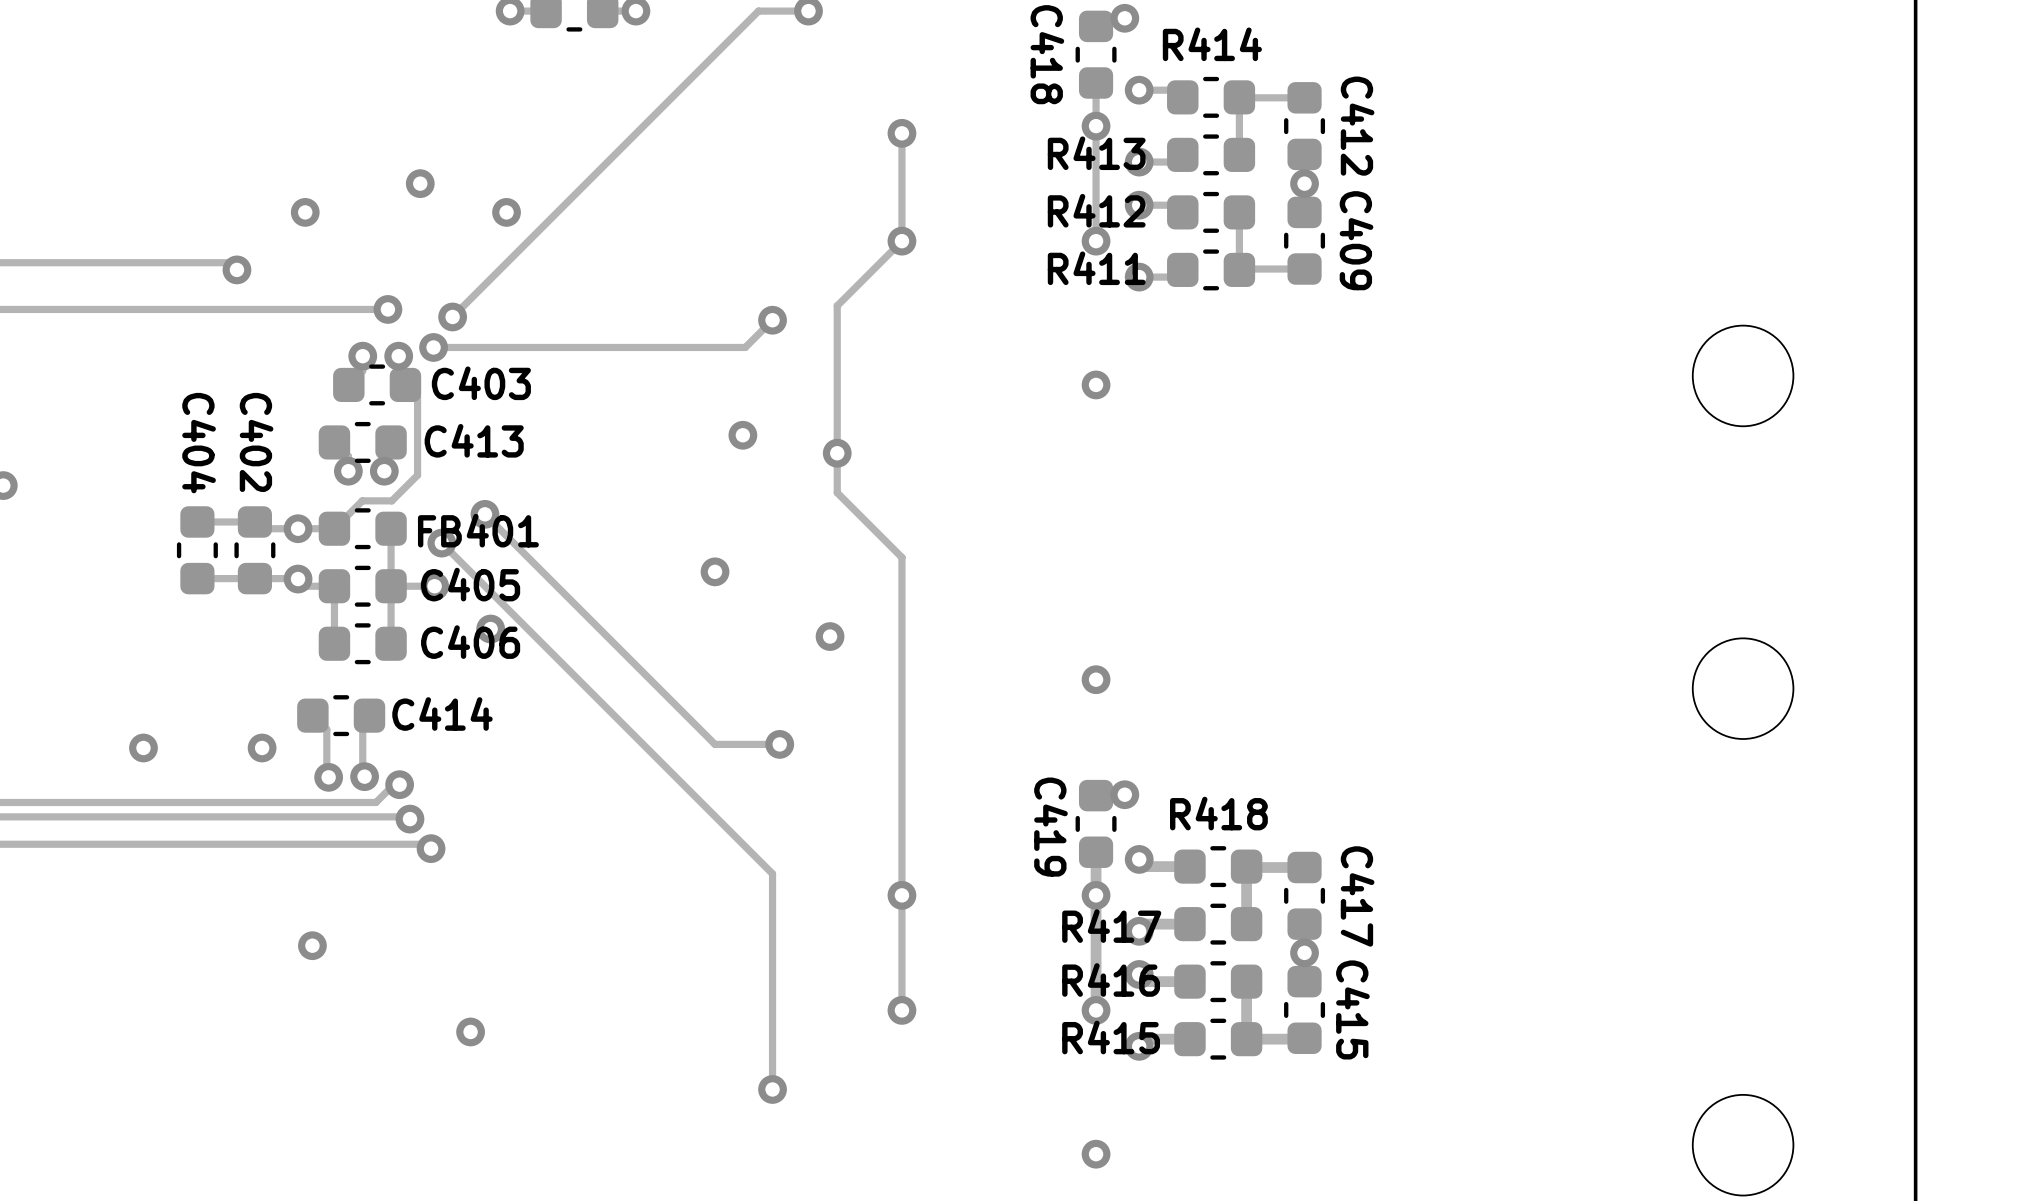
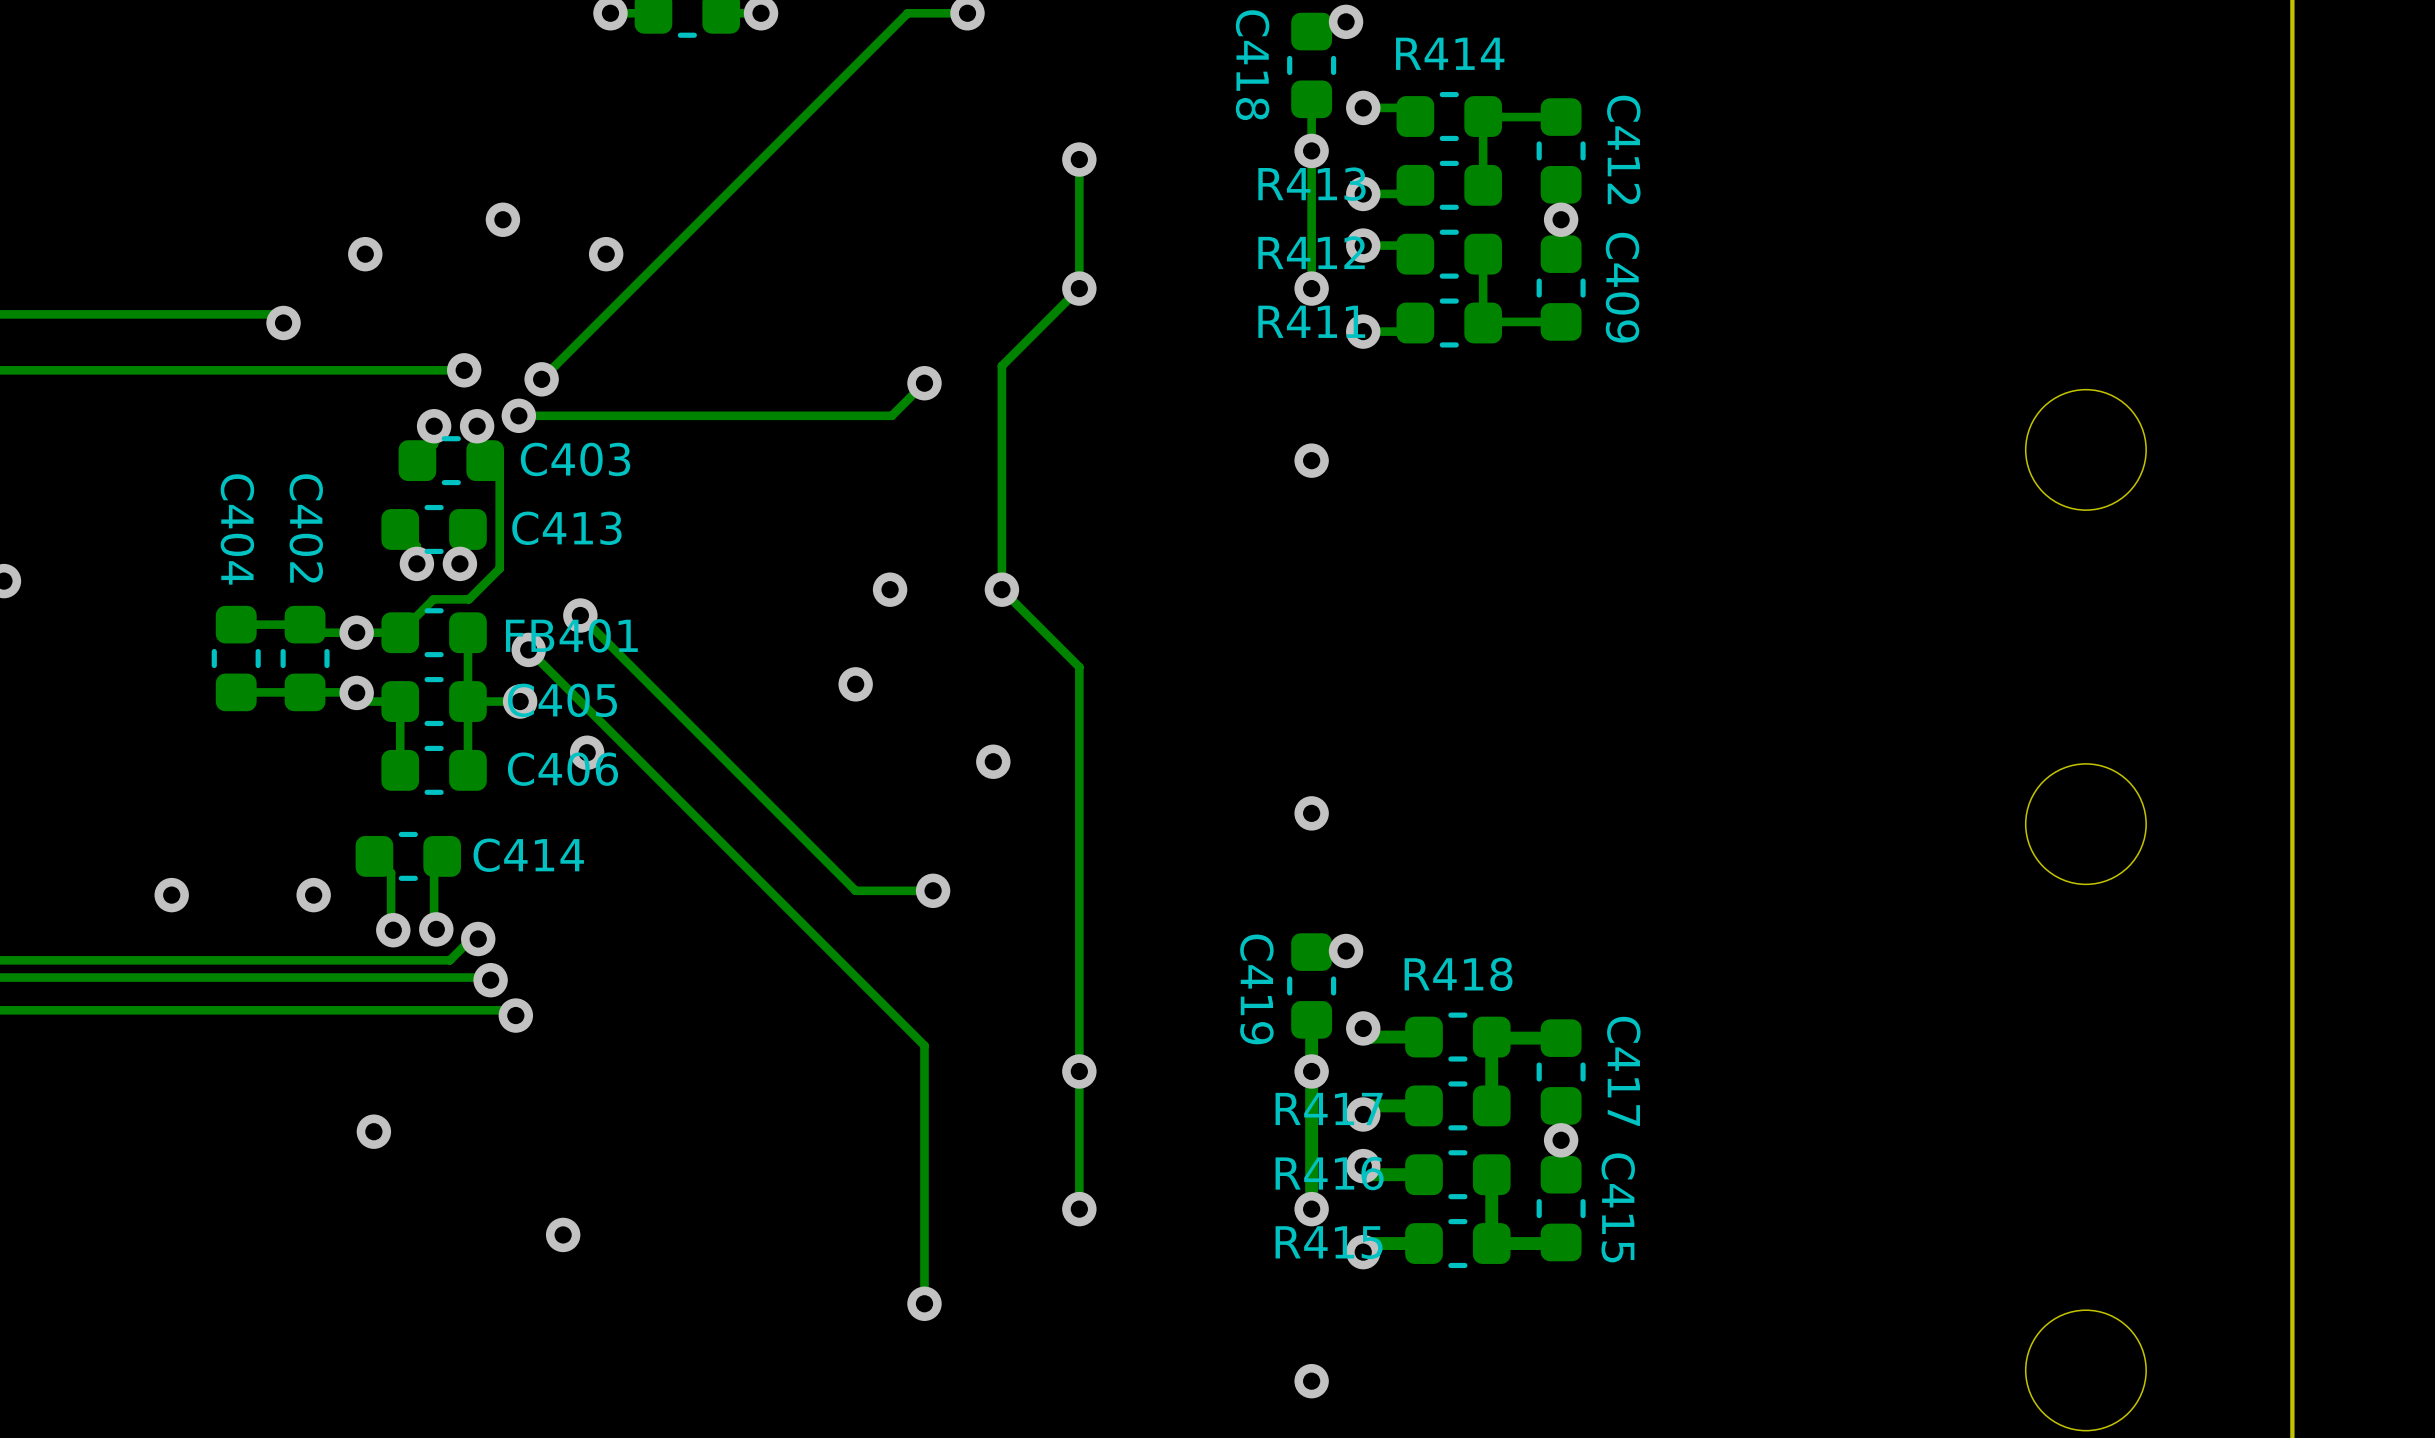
via: (742, 435) -> none
via position: (837, 453) -> (1001, 589)
via: none -> (890, 589)

